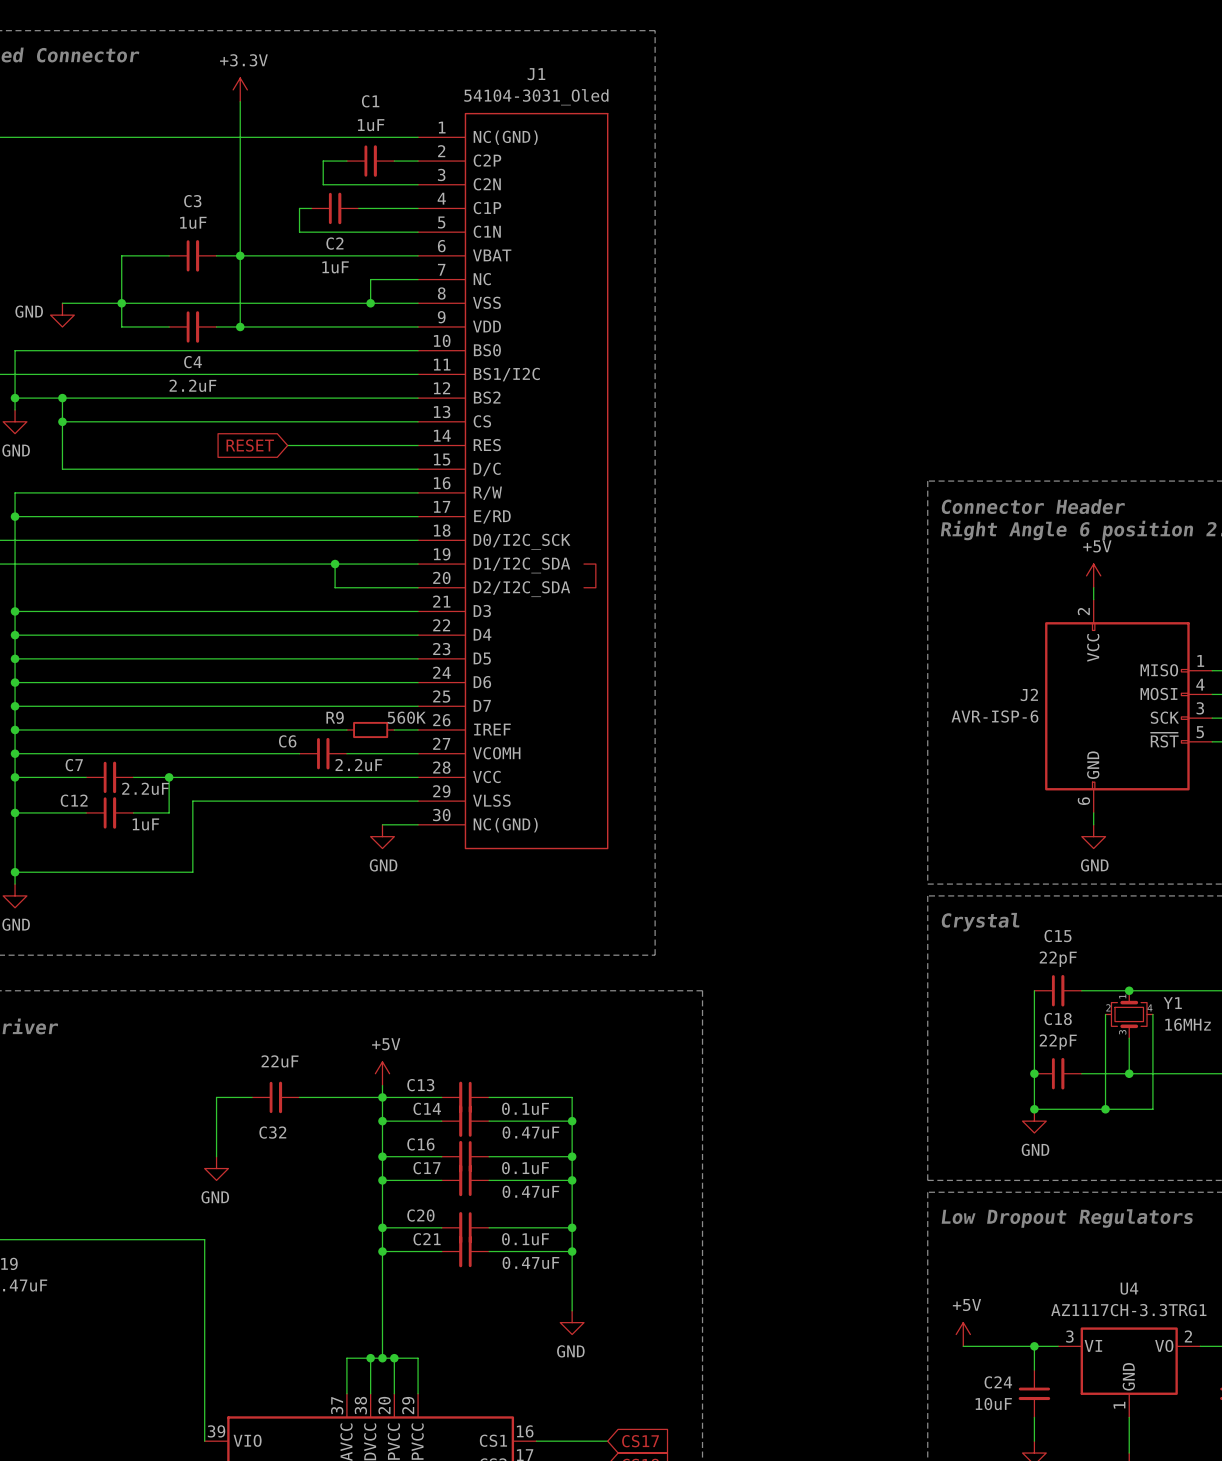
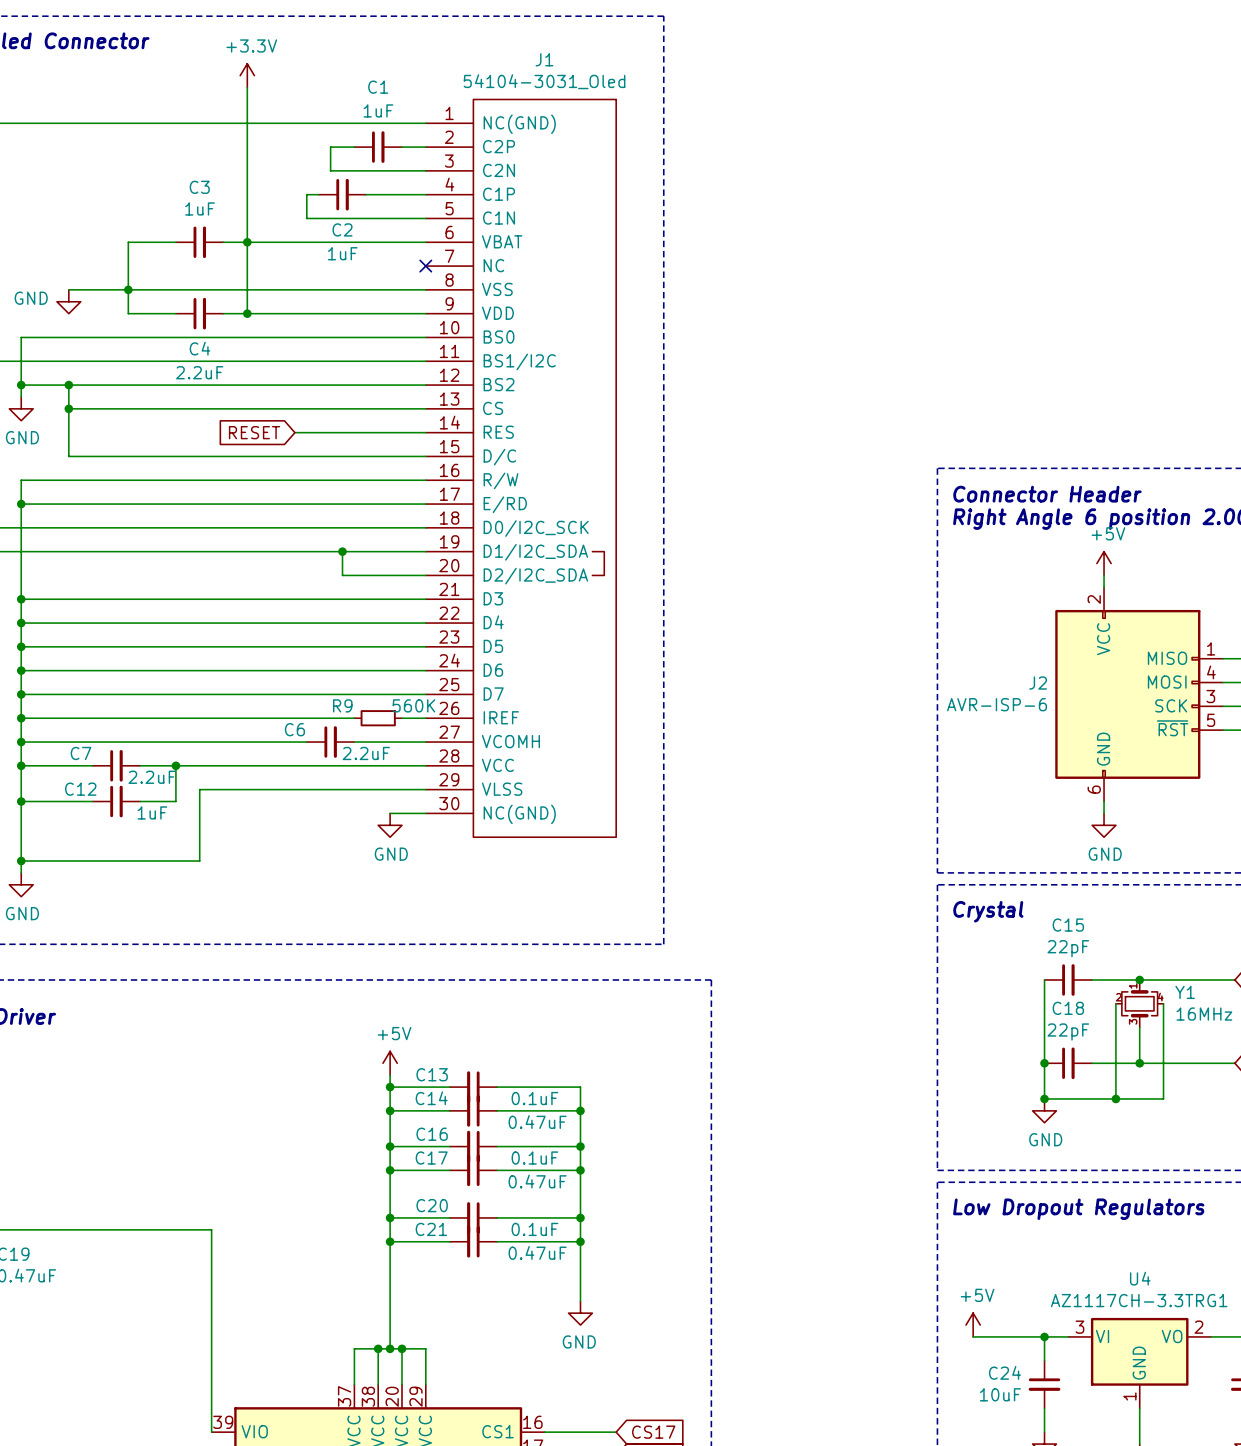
wire: (418, 279) (370, 279) (370, 303) -> none
no-connect mark: none -> (425, 266)
junction: (370, 303) -> none
wire: (252, 1097) (216, 1097) (216, 1156) -> none
C32: 22uF (275, 1097) -> none
wire: (299, 1097) (382, 1097) -> none
power symbol: GND (216, 1168) -> none

